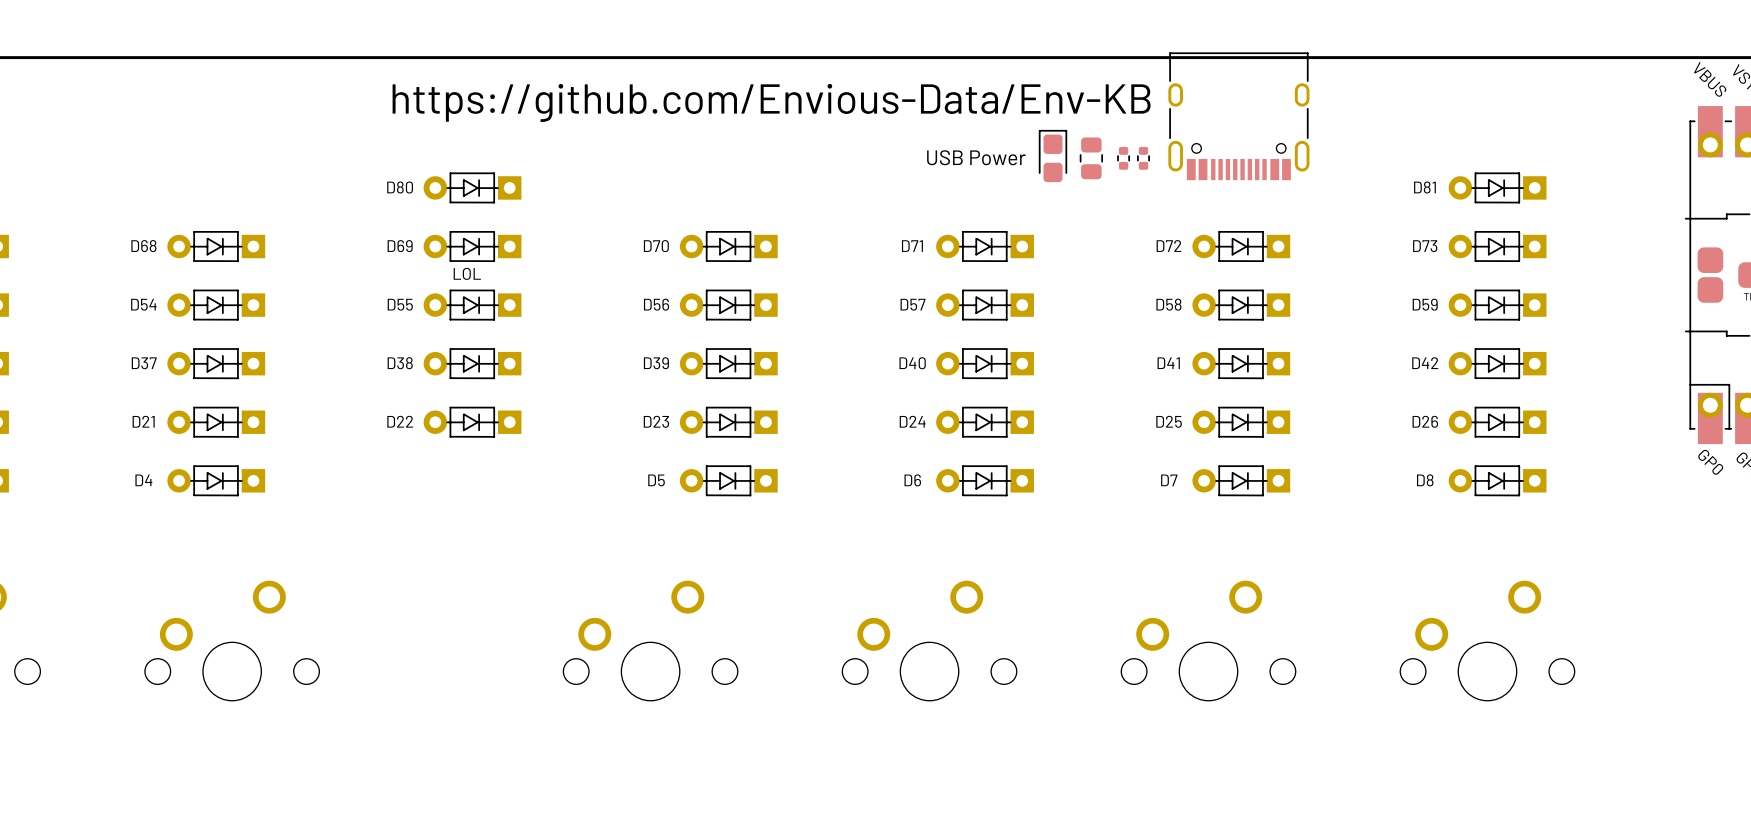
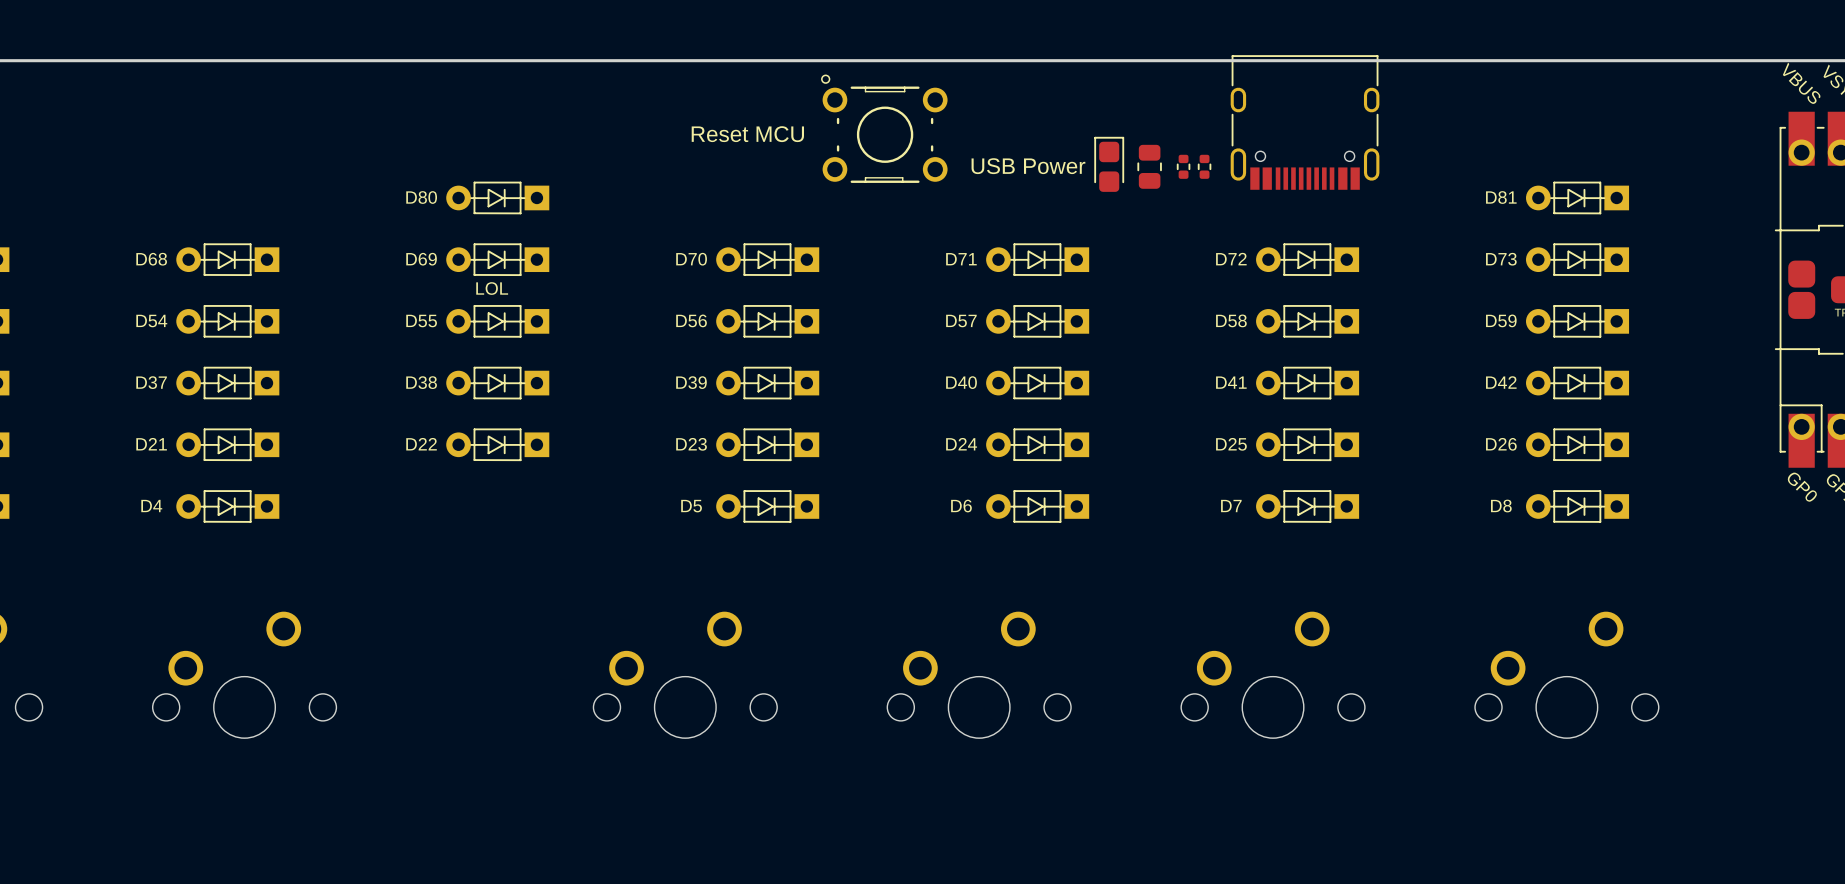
text: https://github.com/Envious-Data/Env-KB (771, 102) -> none
part: none -> (884, 128)
text: none -> Reset MCU (747, 134)

